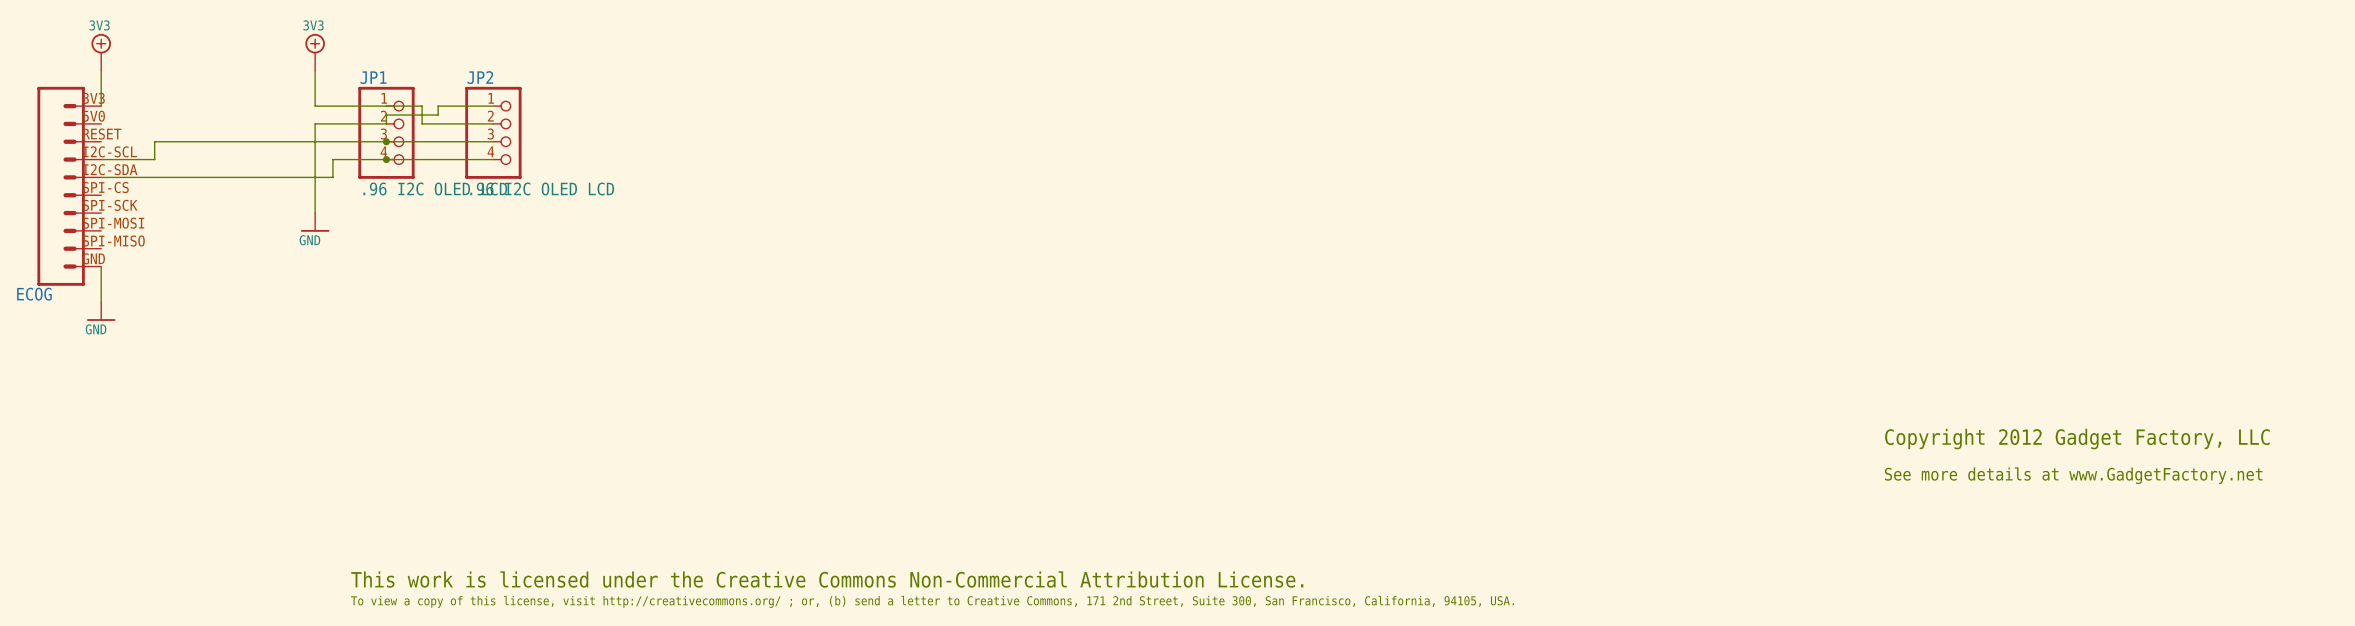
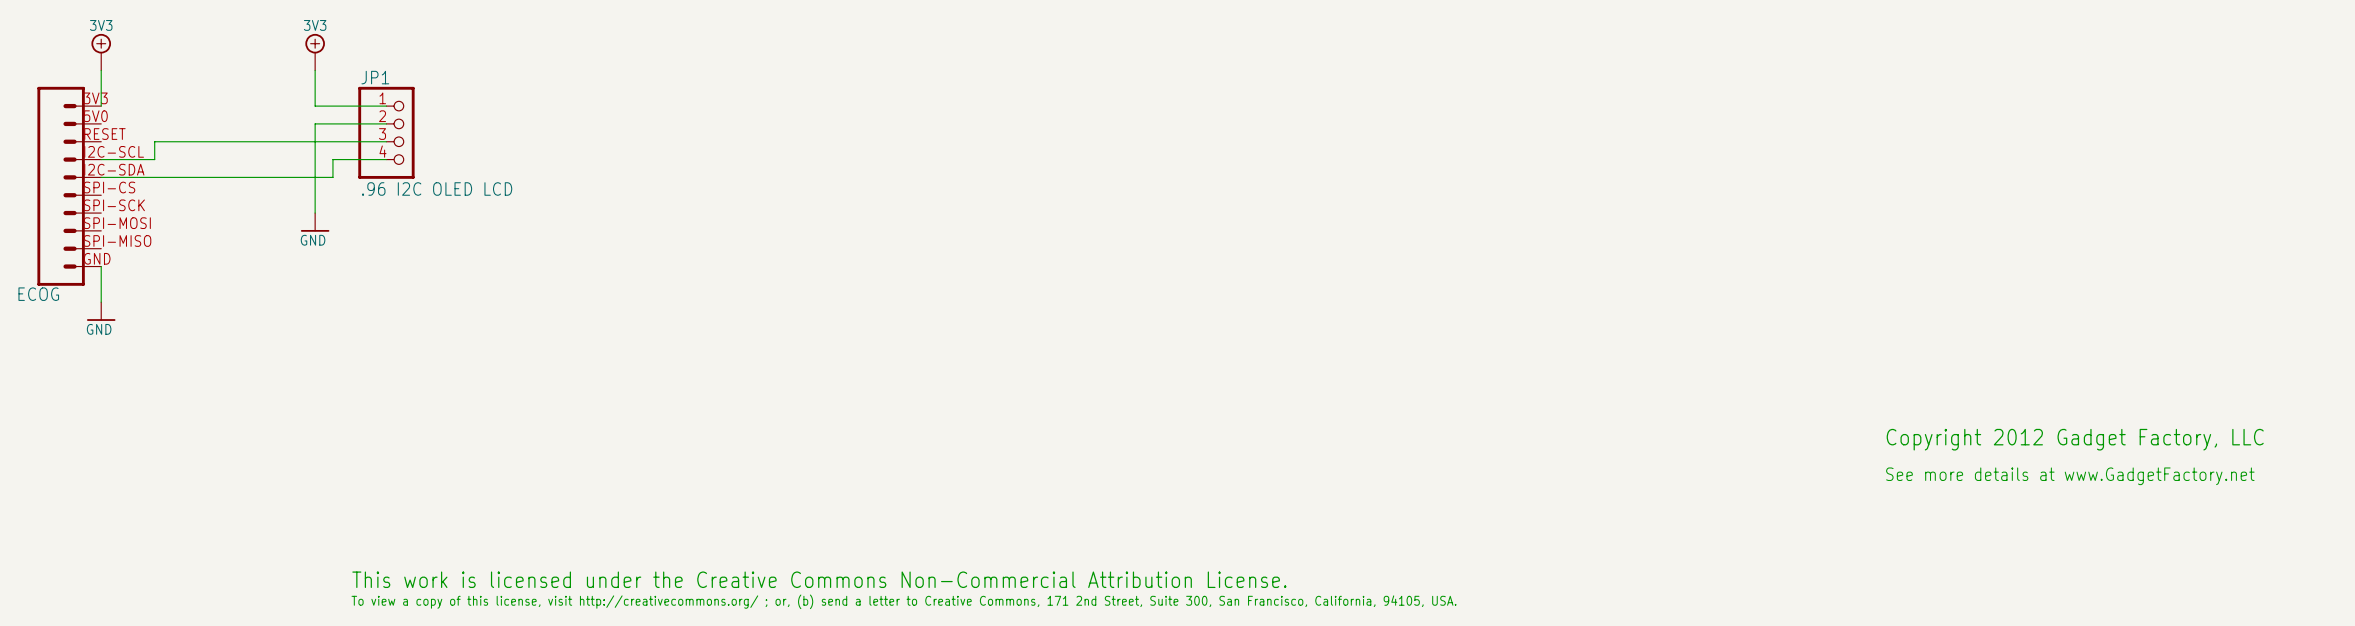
wire: (386, 106) (422, 106) (422, 123) (493, 123) -> none
wire: (493, 106) (438, 106) (438, 115) (386, 115) (386, 123) -> none
JP2: .96 I2C OLED LCD (493, 132) -> none
wire: (386, 141) (493, 141) -> none
junction: (386, 141) -> none
wire: (386, 159) (493, 159) -> none
junction: (386, 159) -> none

